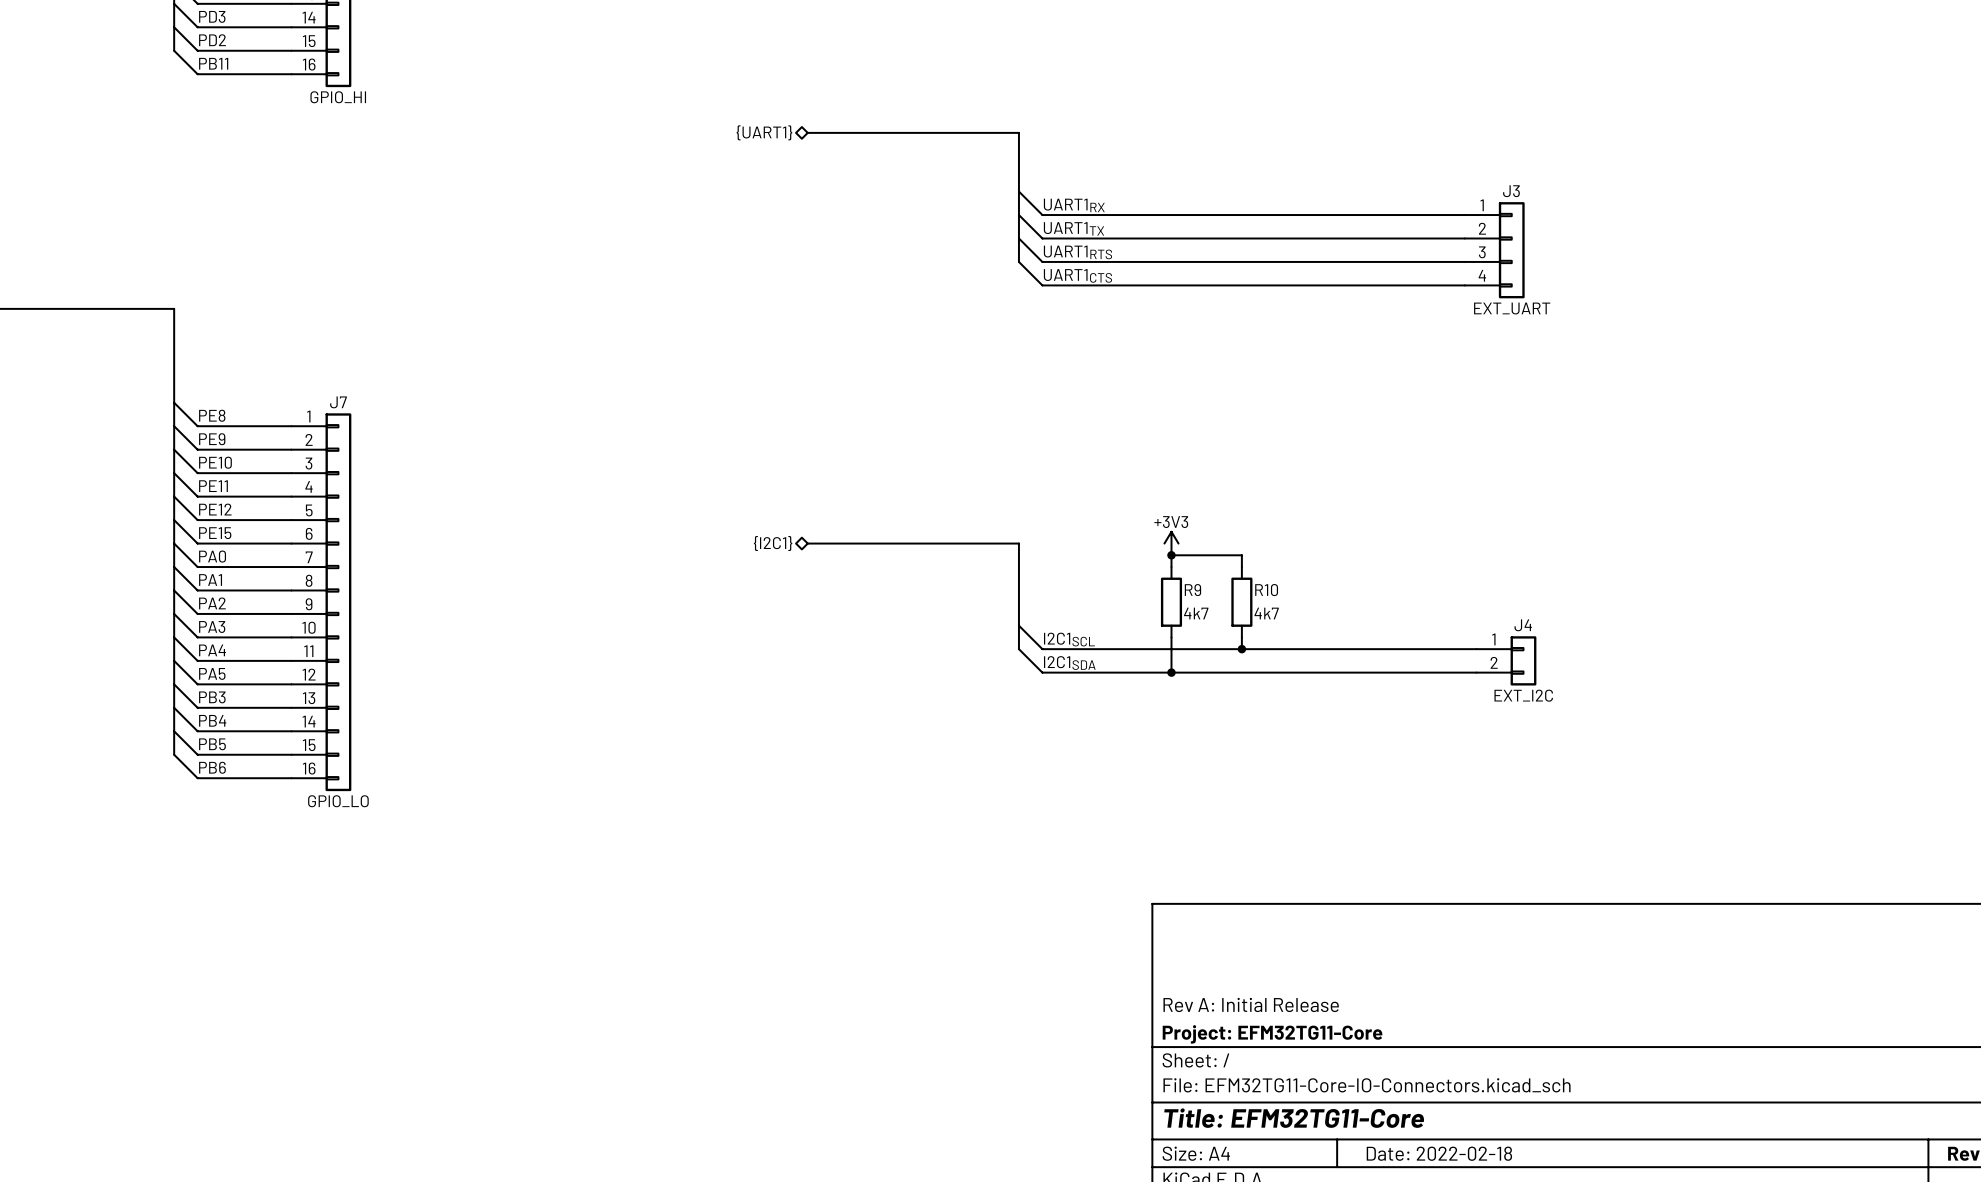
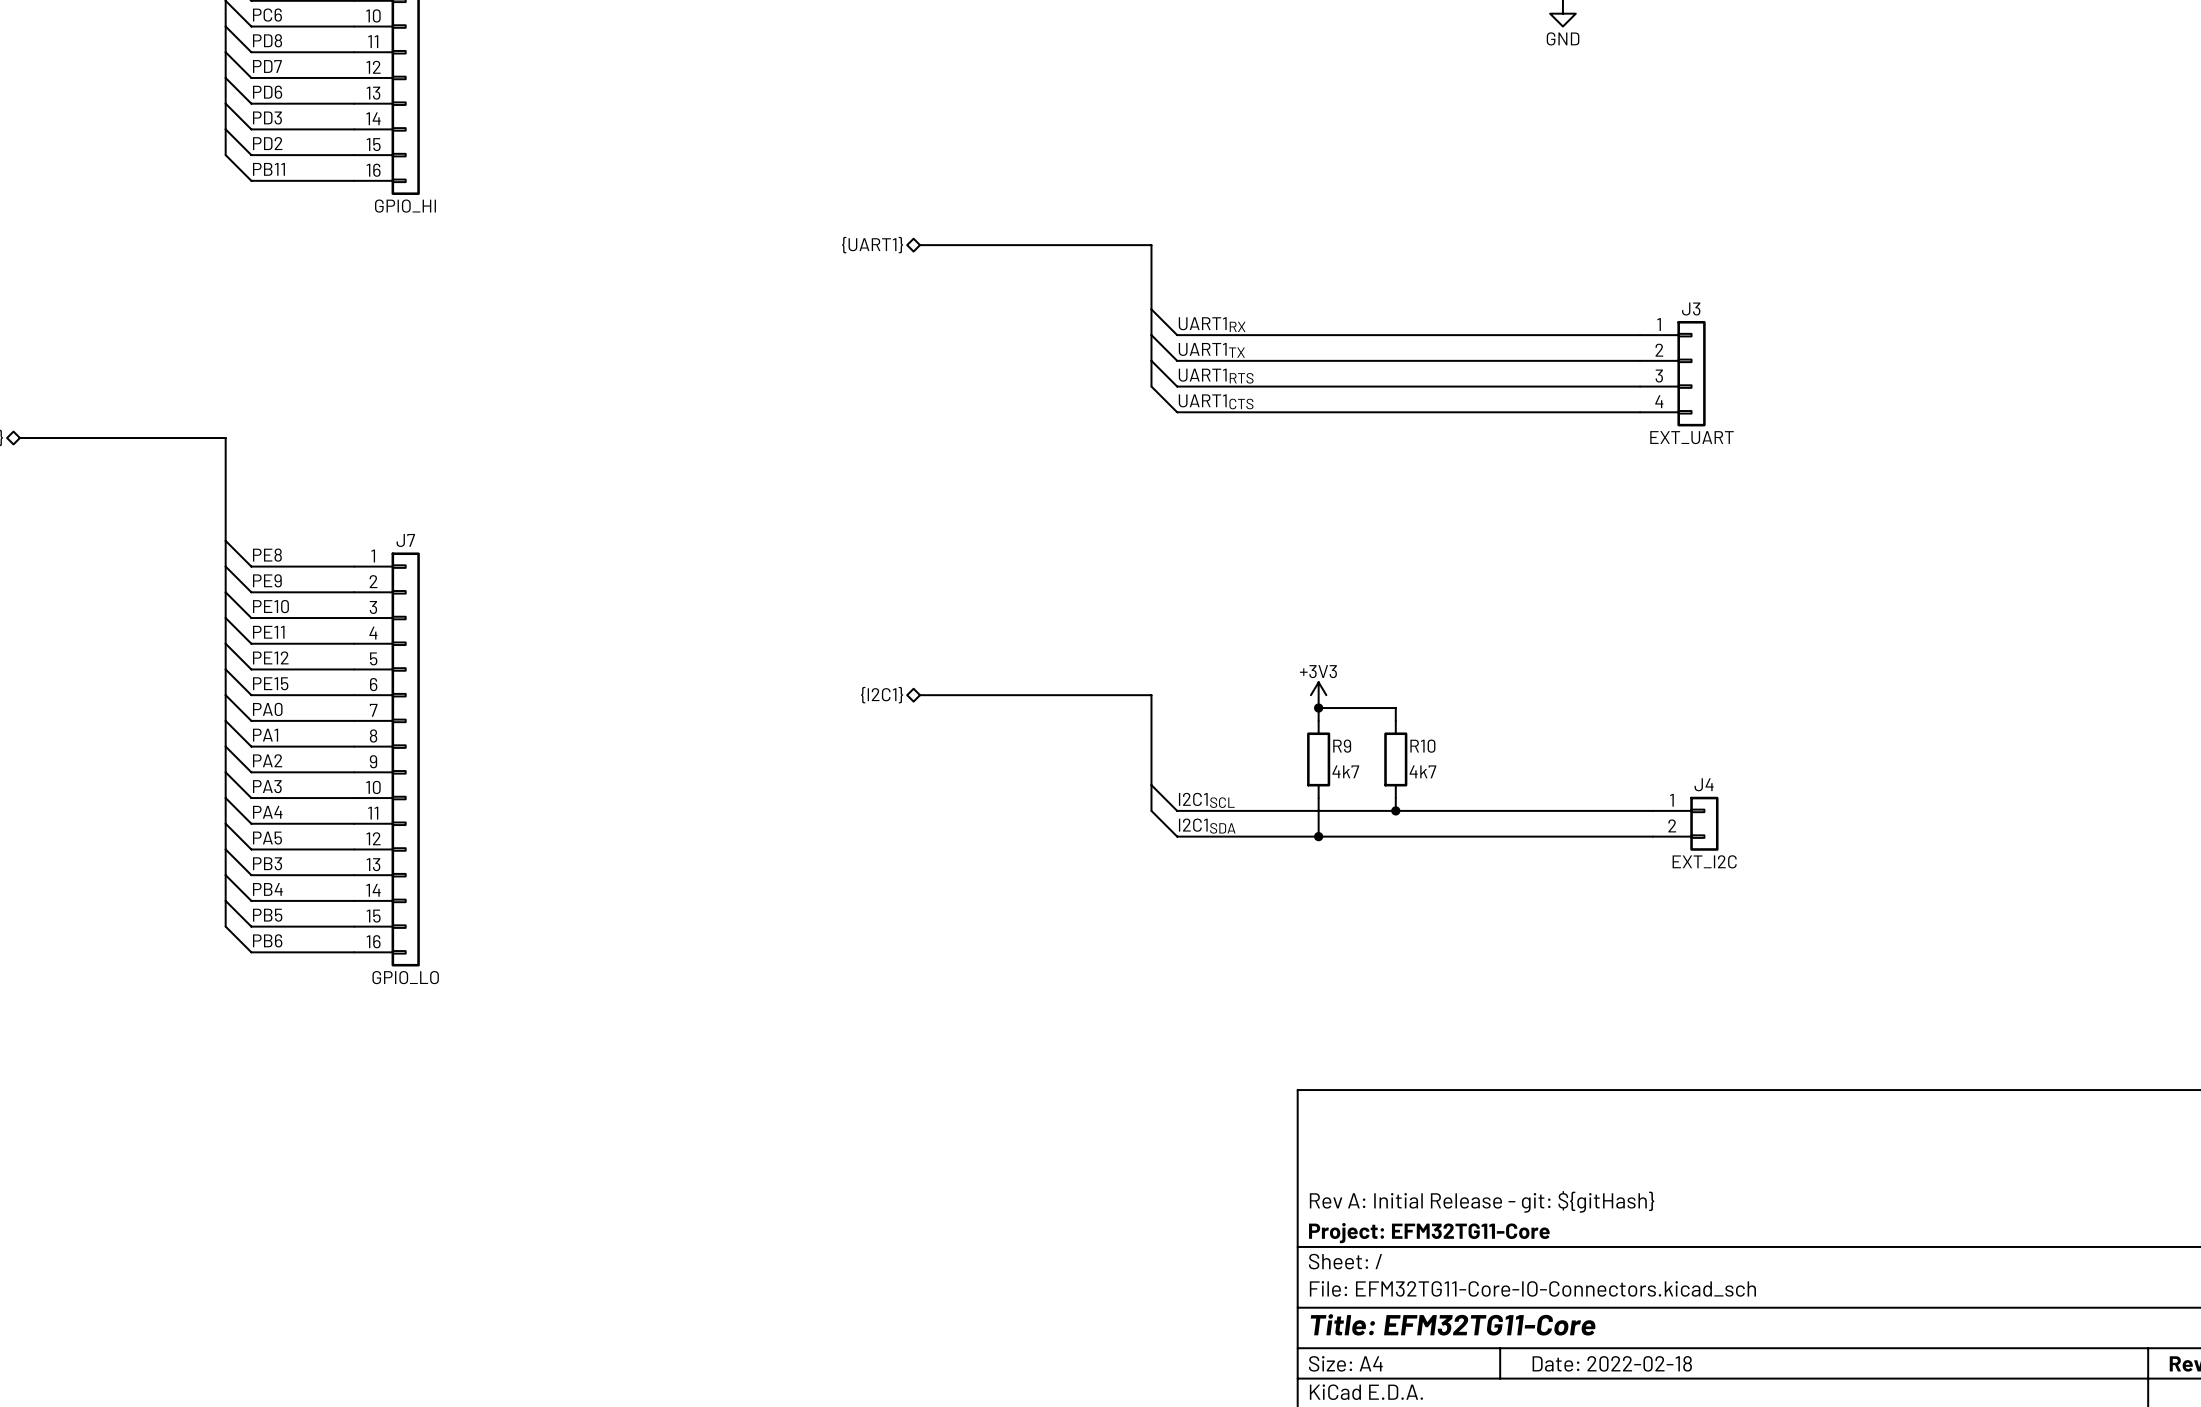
title block: Rev A: Initial Release (1251, 1004) -> Rev A: Initial Release - git: ${gitHash} (1482, 1201)

